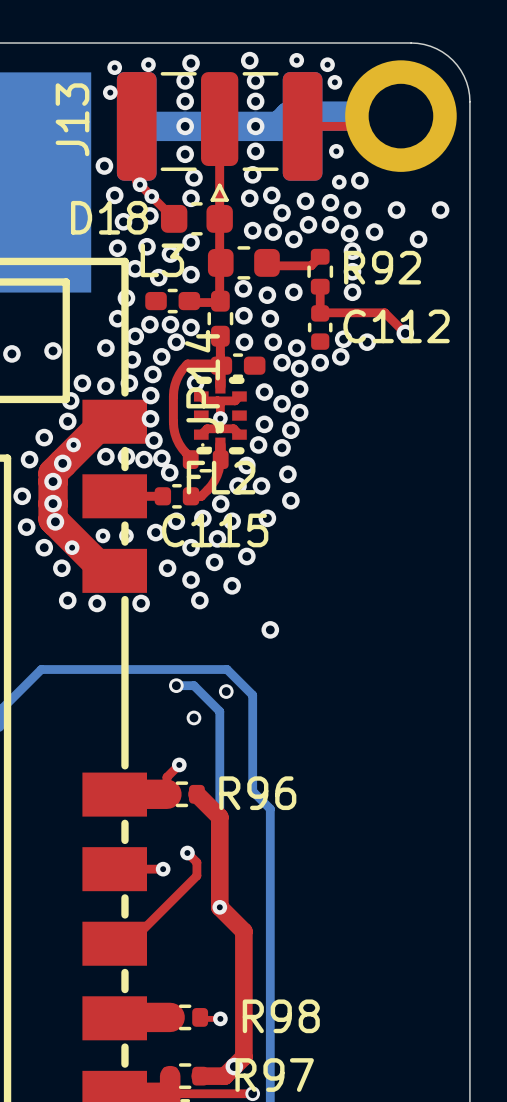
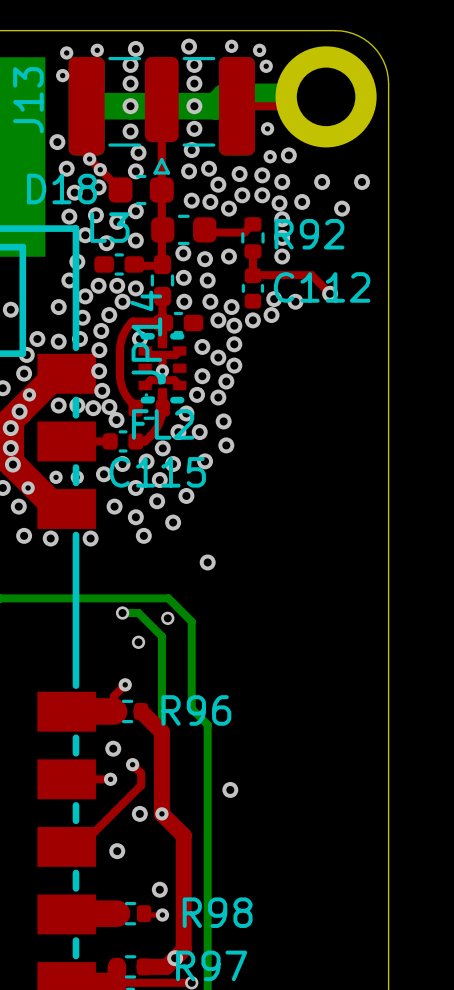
via: none -> (113, 748)
via: none -> (230, 789)
via: none -> (139, 813)
via: none -> (117, 851)
via: none -> (159, 889)

